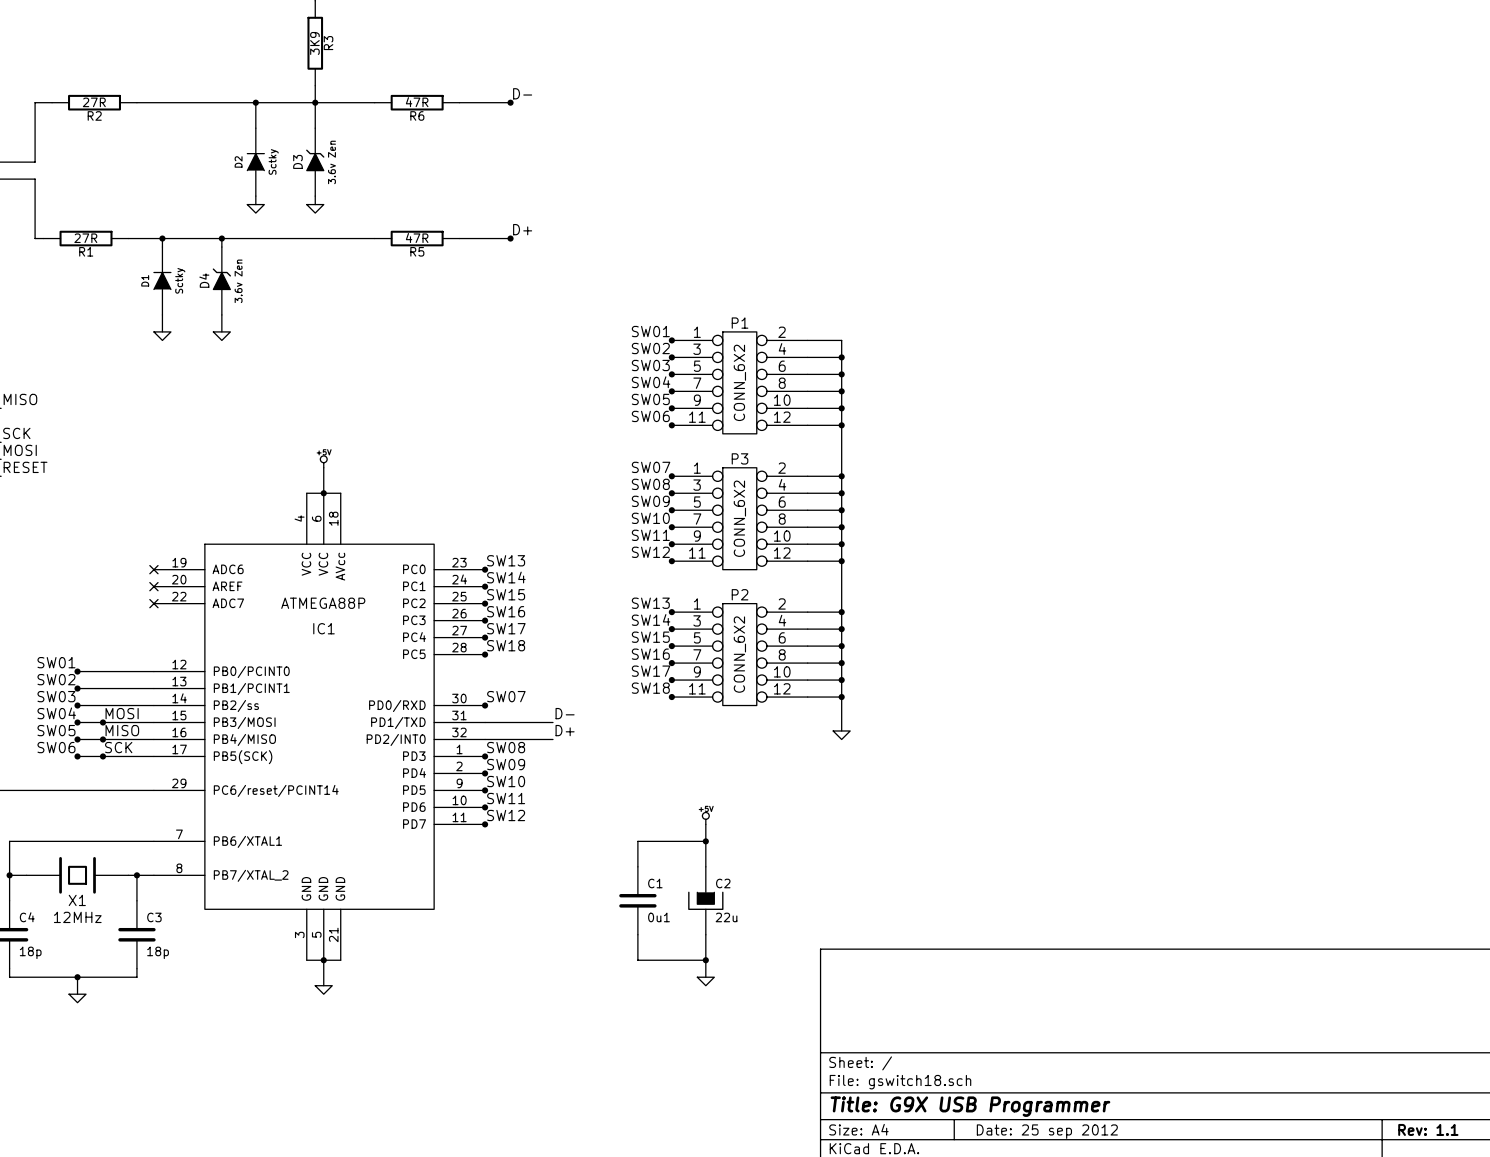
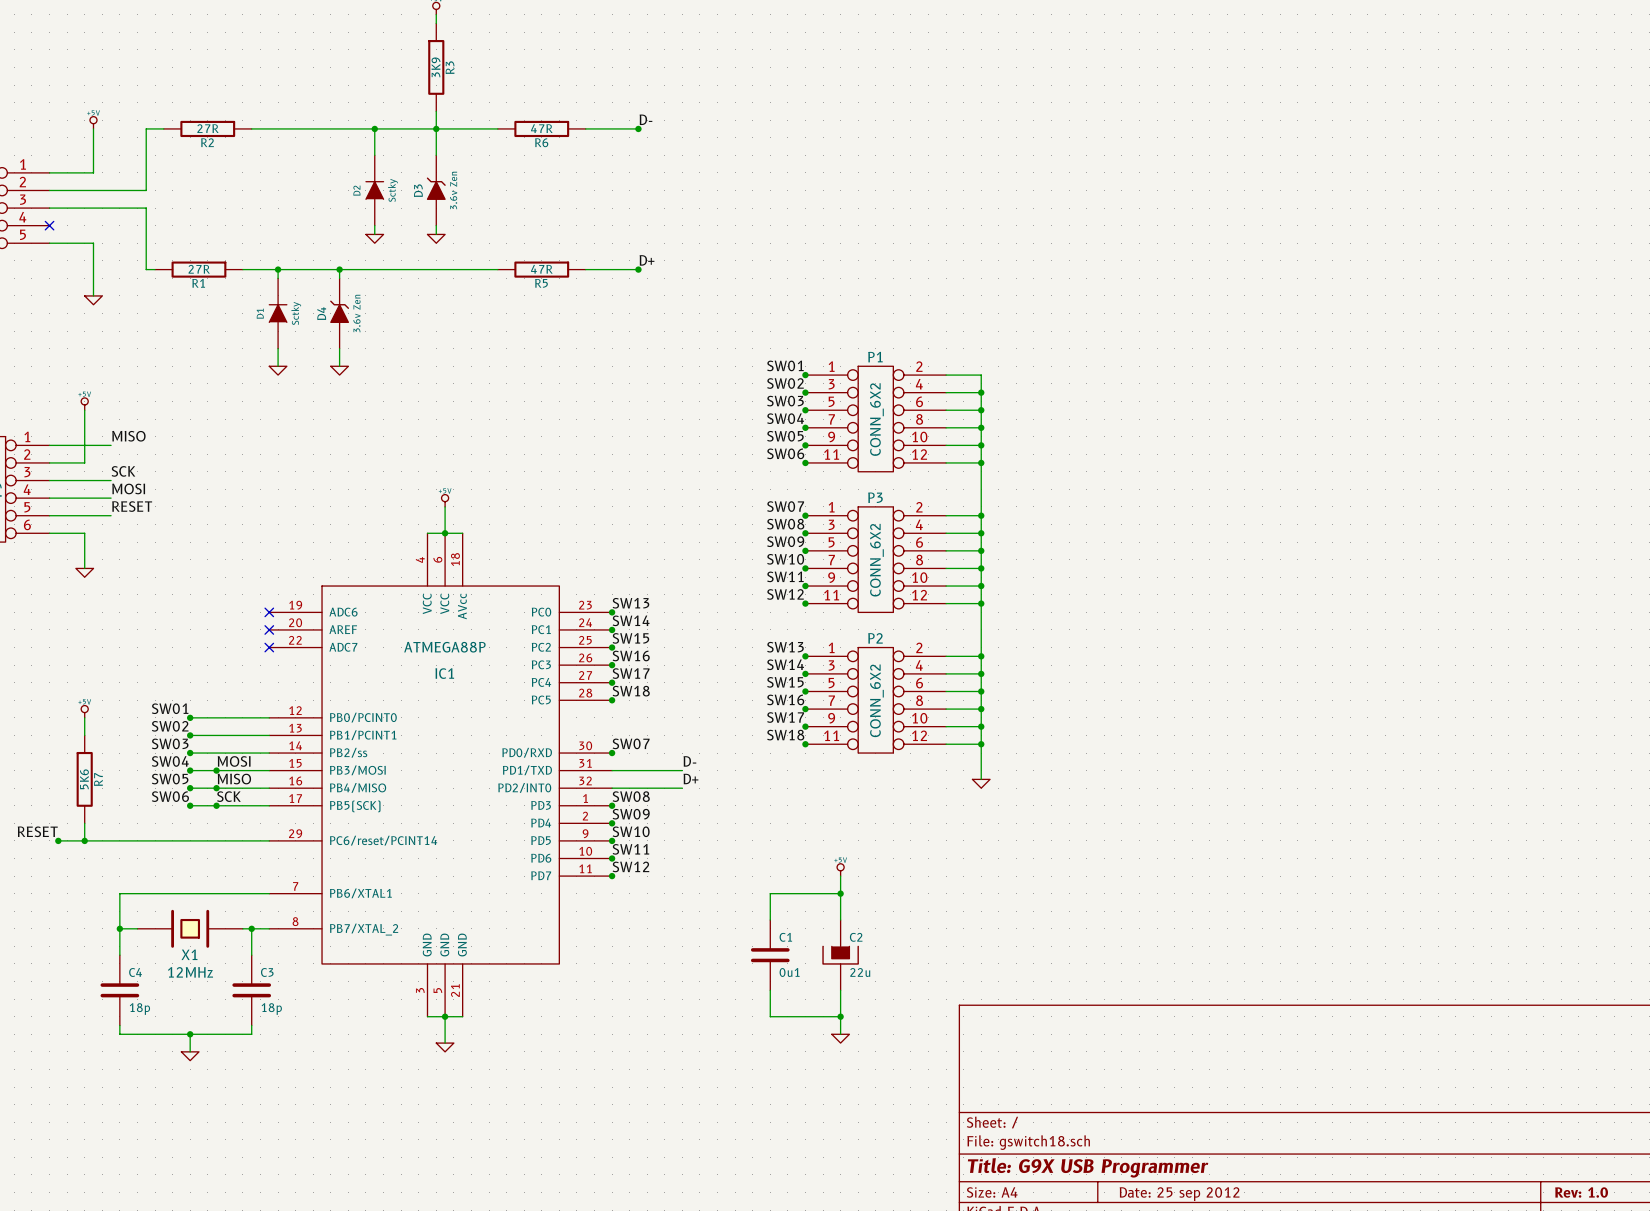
title block: Rev: 1.1 (1428, 1129) -> Rev: 1.0 (1581, 1192)

